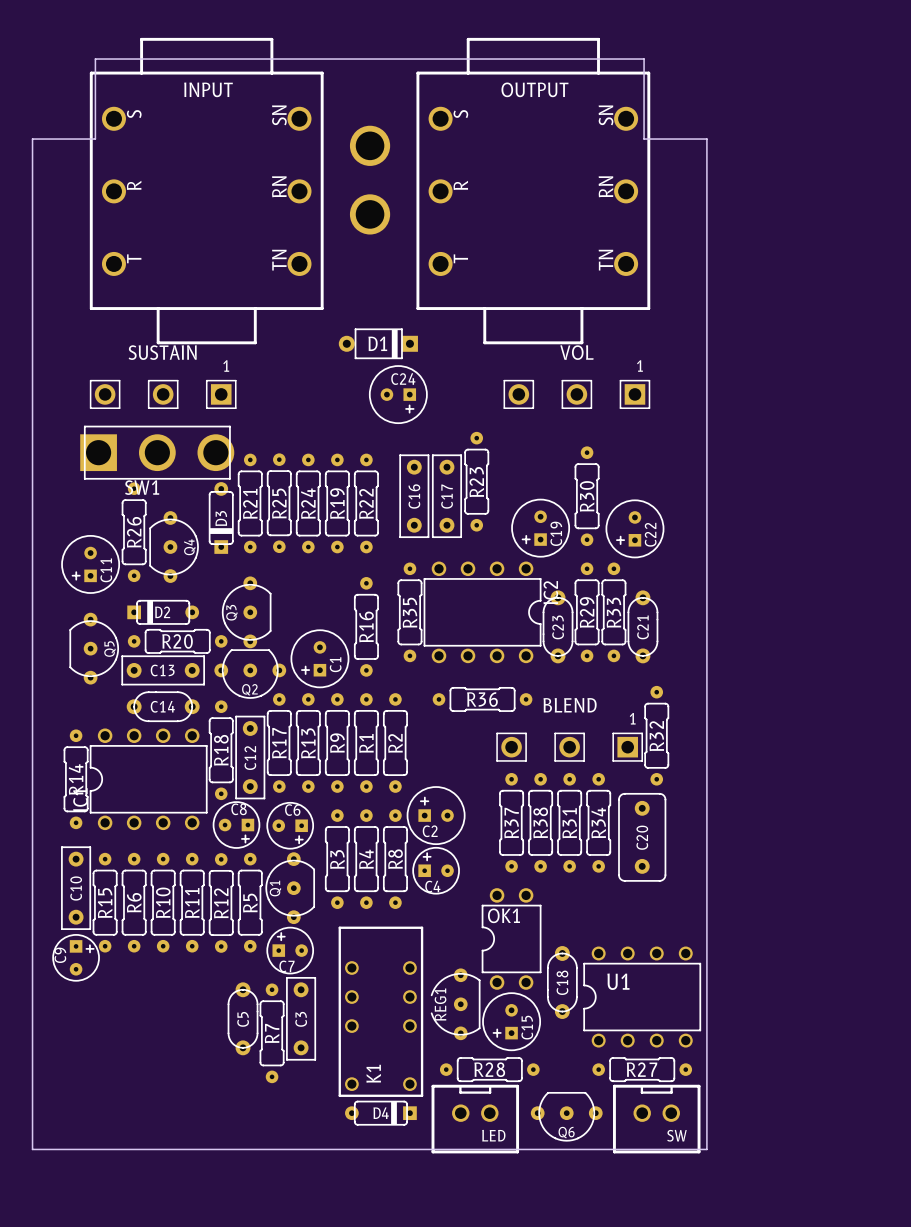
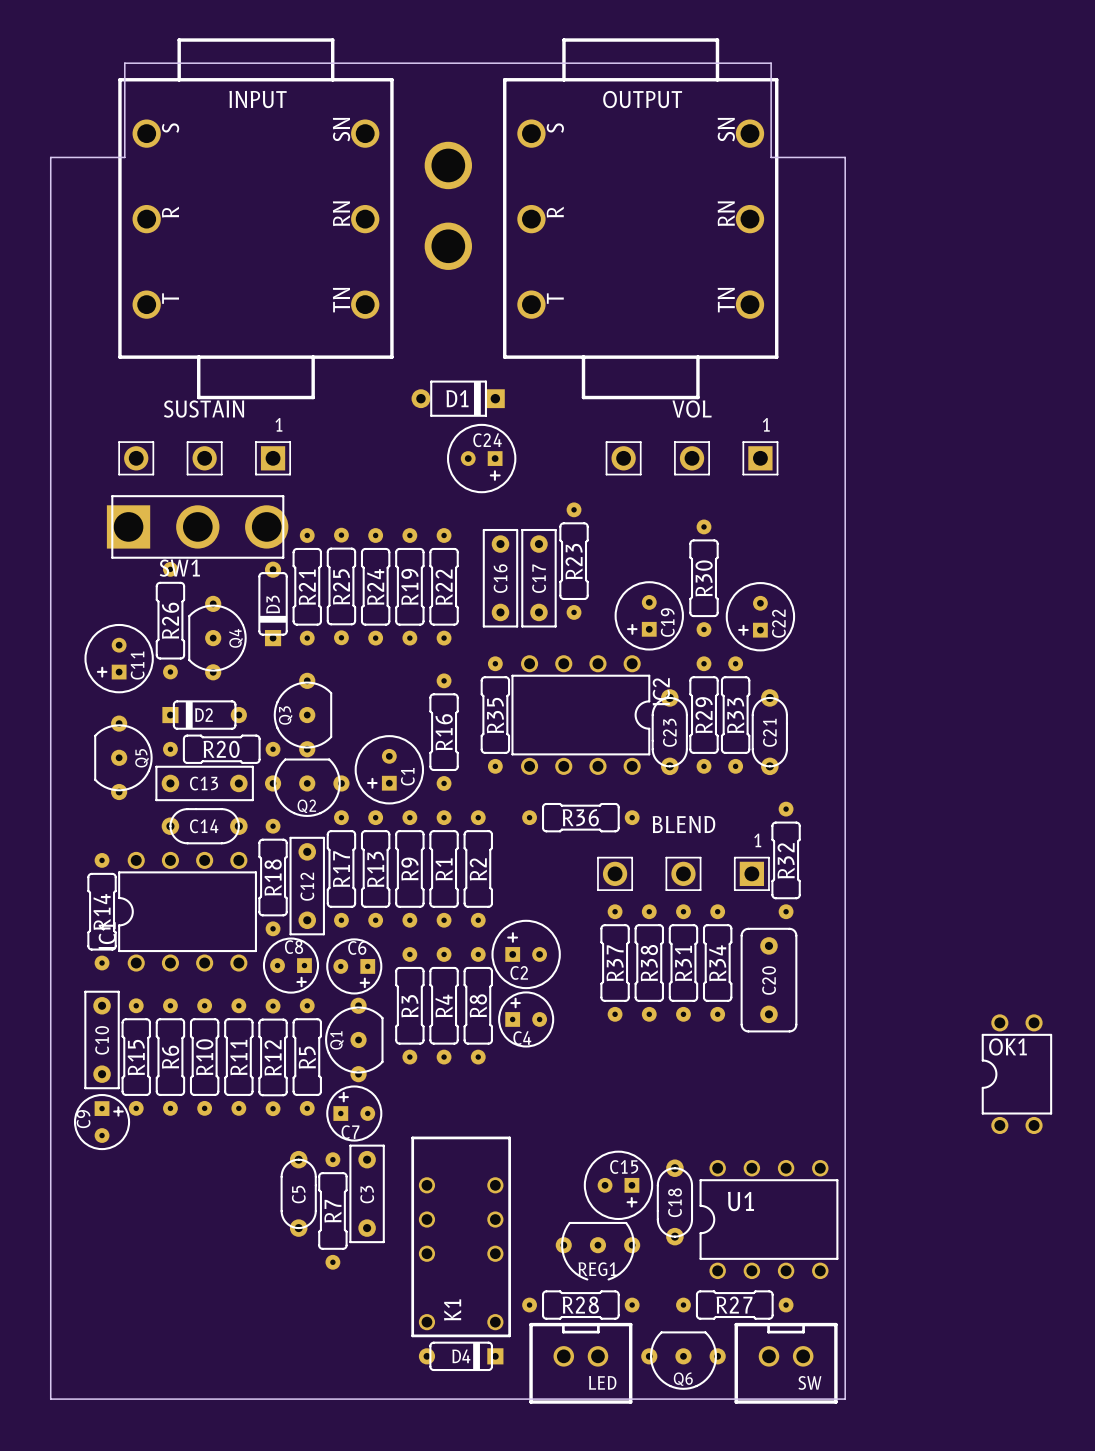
drawing: [32, 59, 707, 1150] -> none
drawing: none -> [50, 63, 846, 1400]
OK1 position: (511, 938) -> (1016, 1074)
C18 position: (562, 982) -> (674, 1202)
U1 position: (642, 997) -> (768, 1219)
REG1 rotation: 0° (455, 1004) -> 90° counterclockwise (597, 1251)
REG1 position: (455, 1004) -> (597, 1251)
K1 position: (380, 1011) -> (461, 1236)
C15 rotation: 0° (511, 1021) -> 90° counterclockwise (618, 1185)
R28 position: (489, 1069) -> (580, 1305)
R27 position: (642, 1069) -> (734, 1305)
D4 position: (380, 1113) -> (461, 1356)
Q6 position: (566, 1116) -> (683, 1360)
LED position: (475, 1119) -> (580, 1363)
SW position: (656, 1119) -> (786, 1363)

